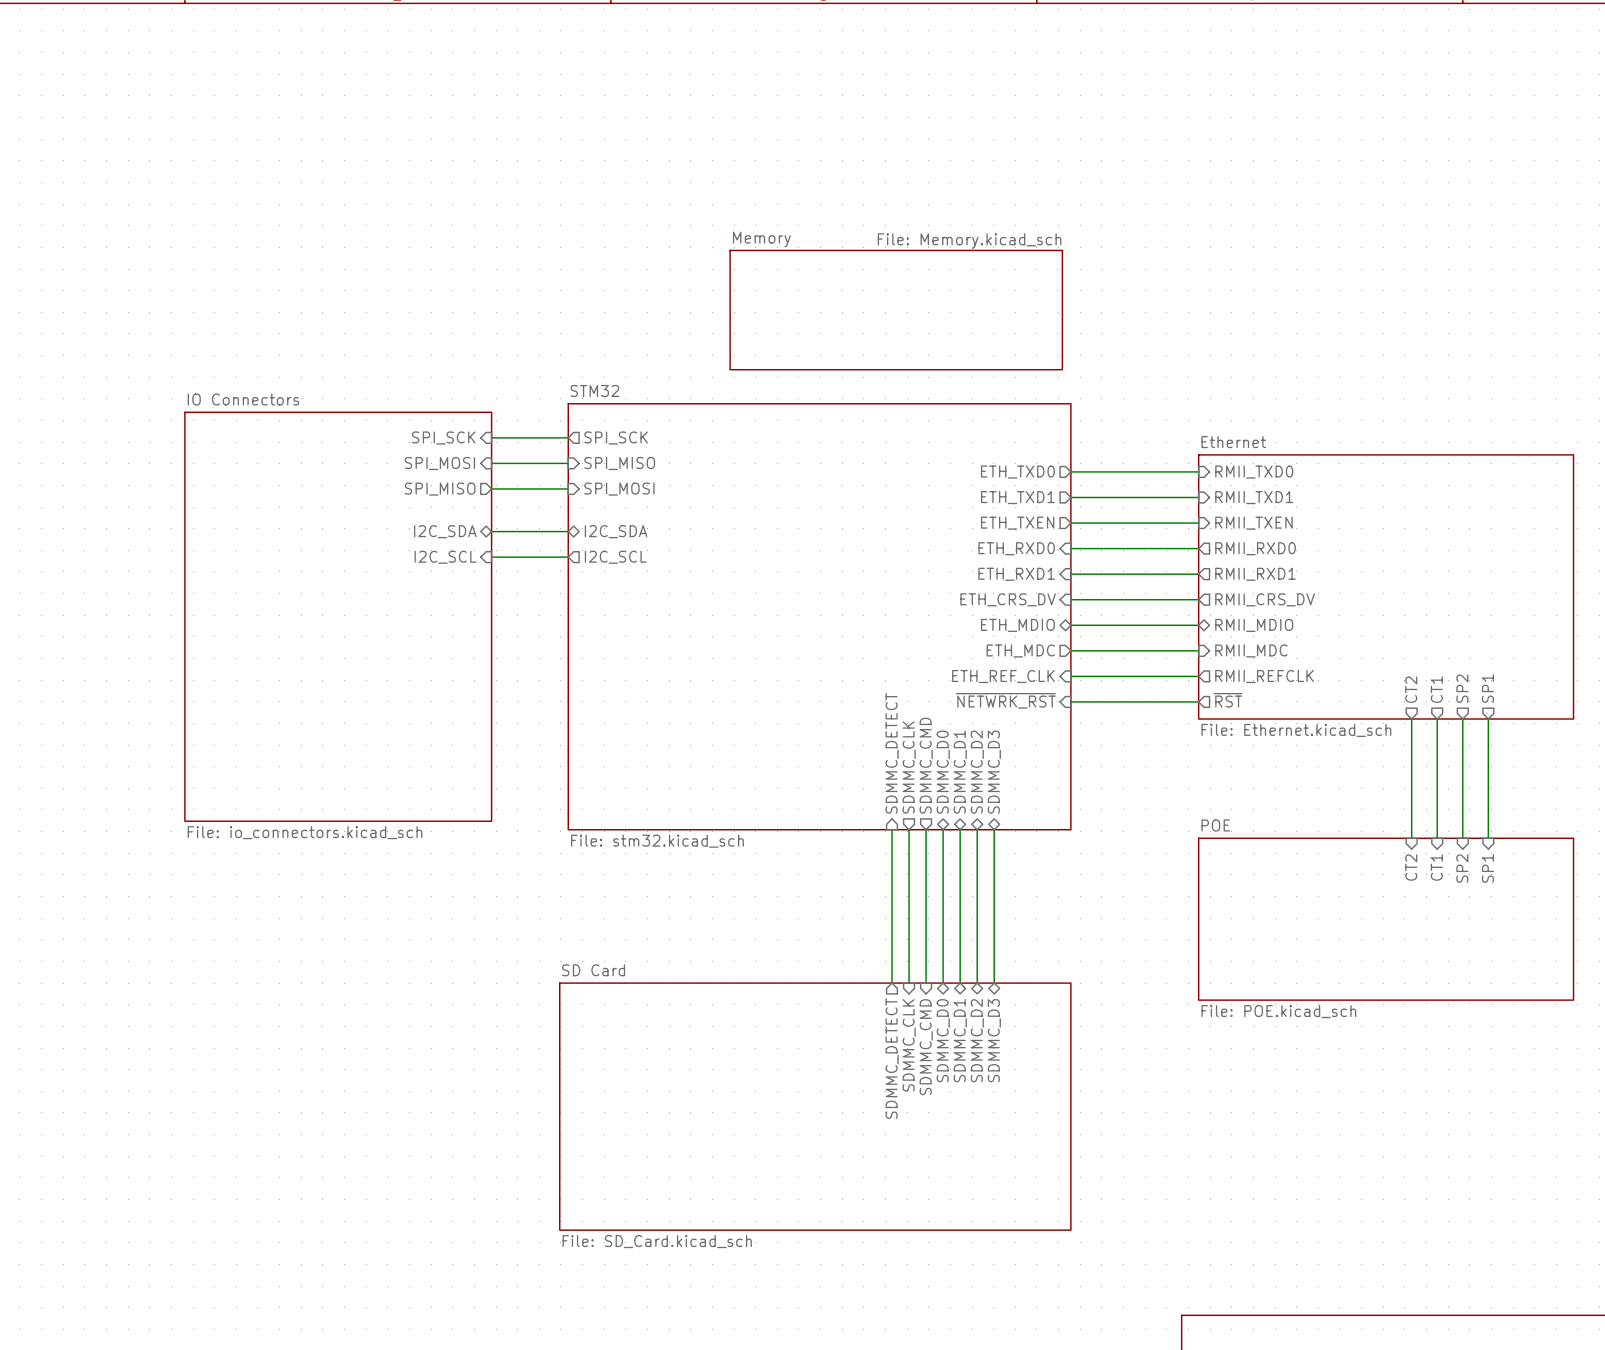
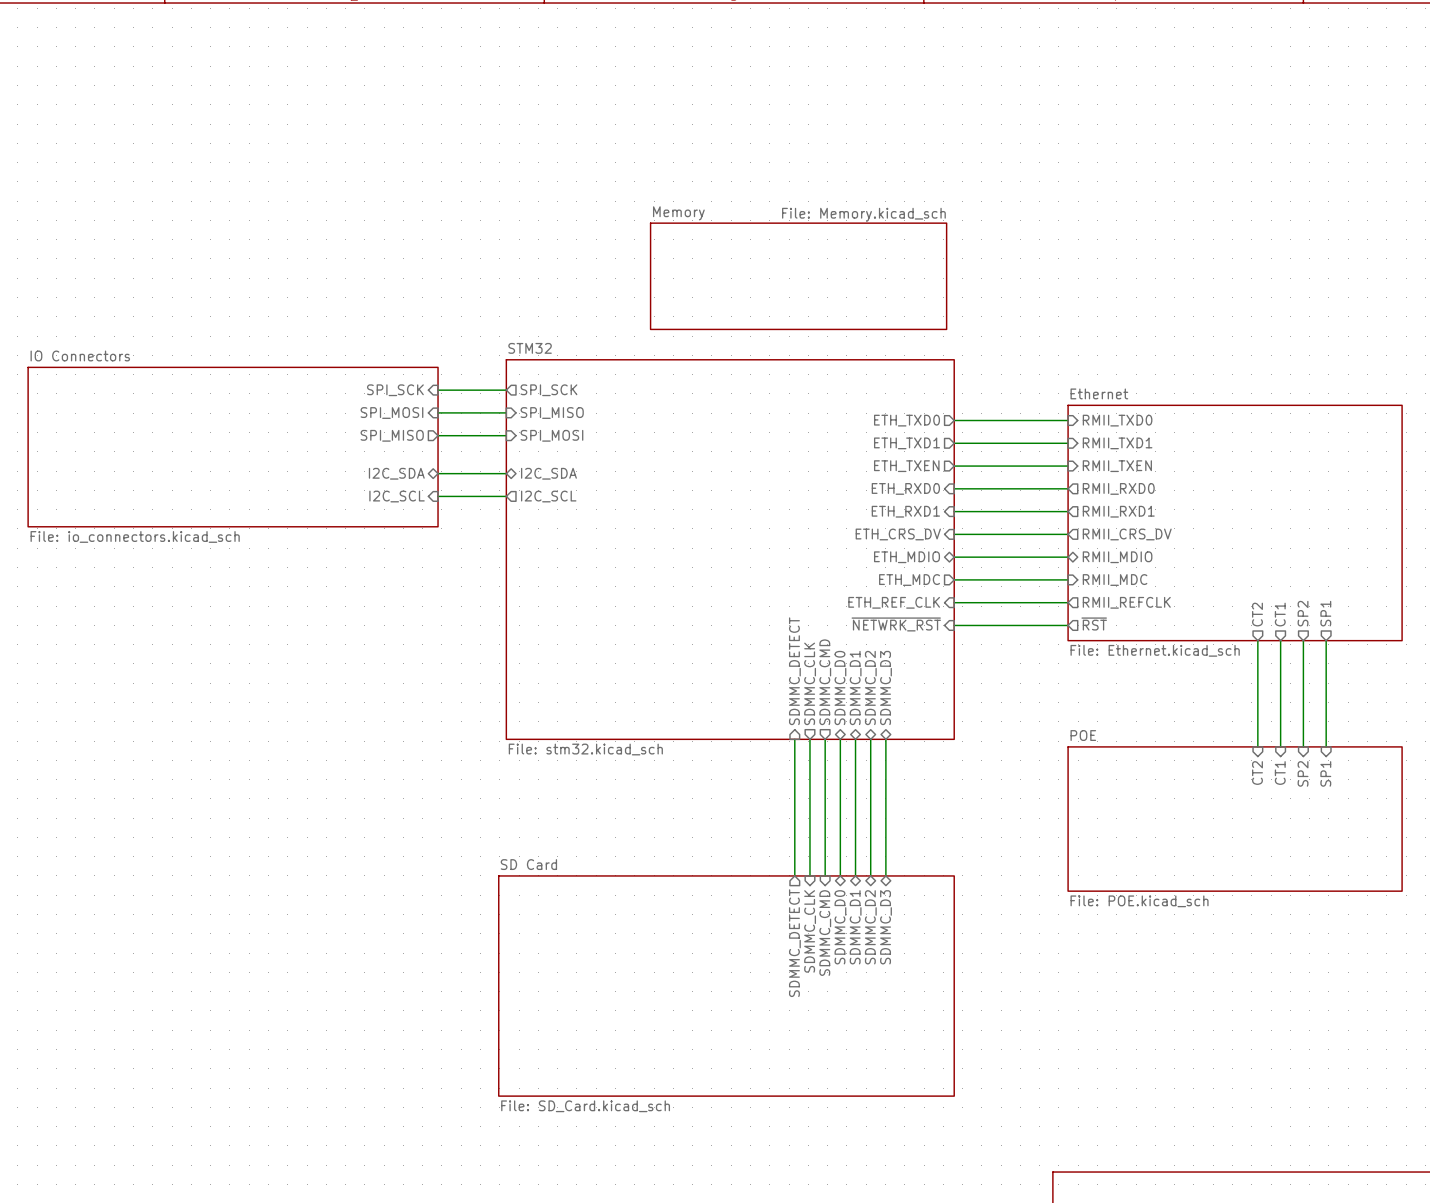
sheet IO Connectors: none -> File: io_connectors.kicad_sch (233, 447)
sheet IO Connectors: File: io_connectors.kicad_sch (338, 616) -> none

